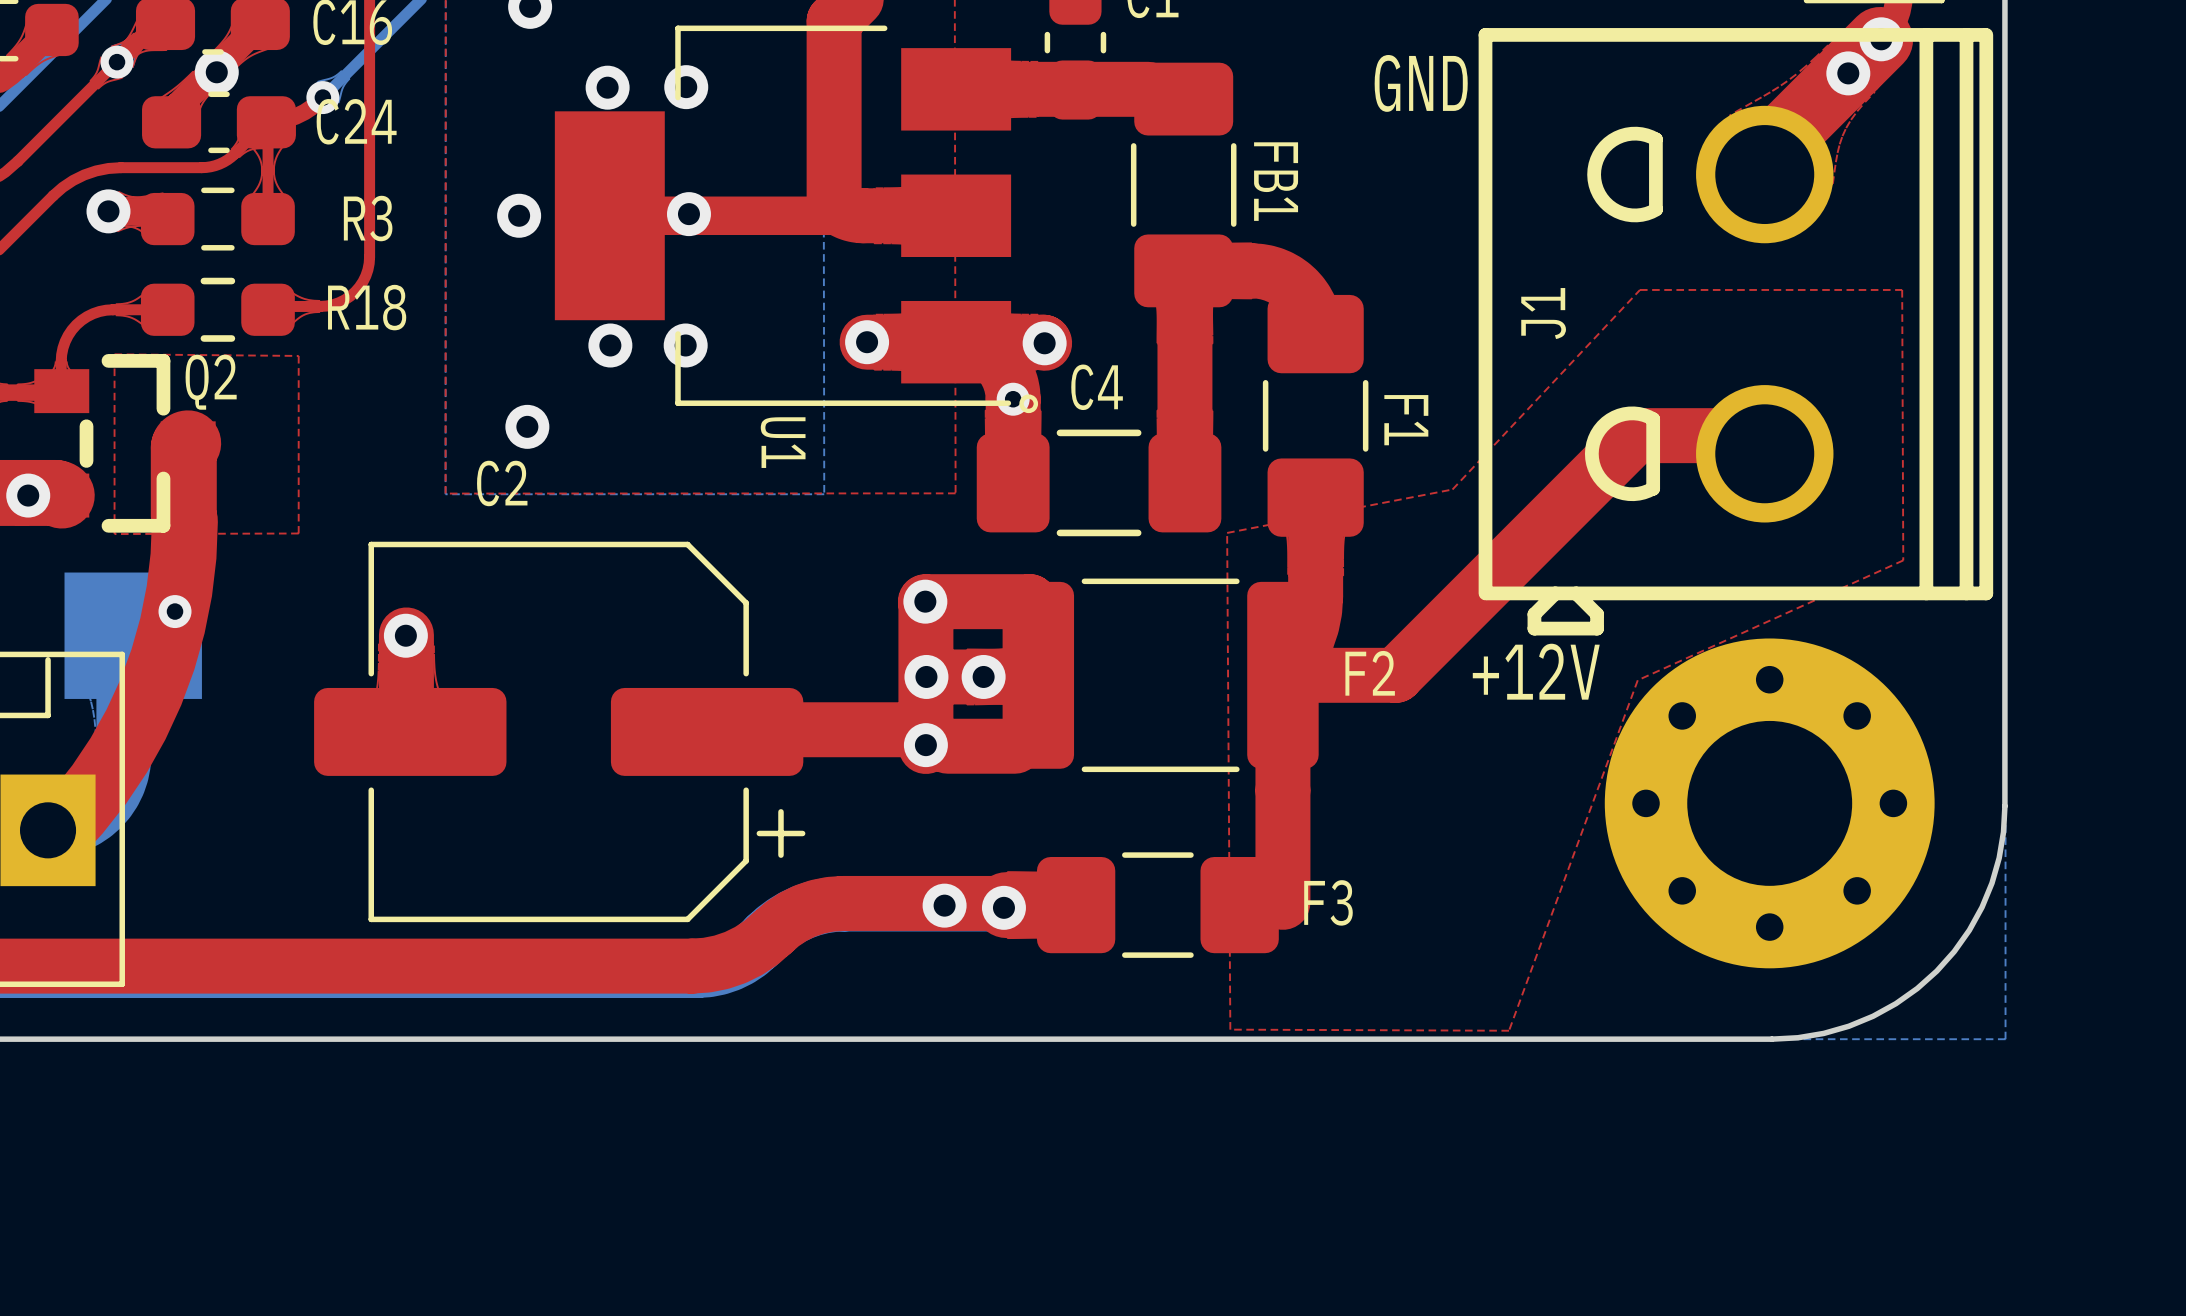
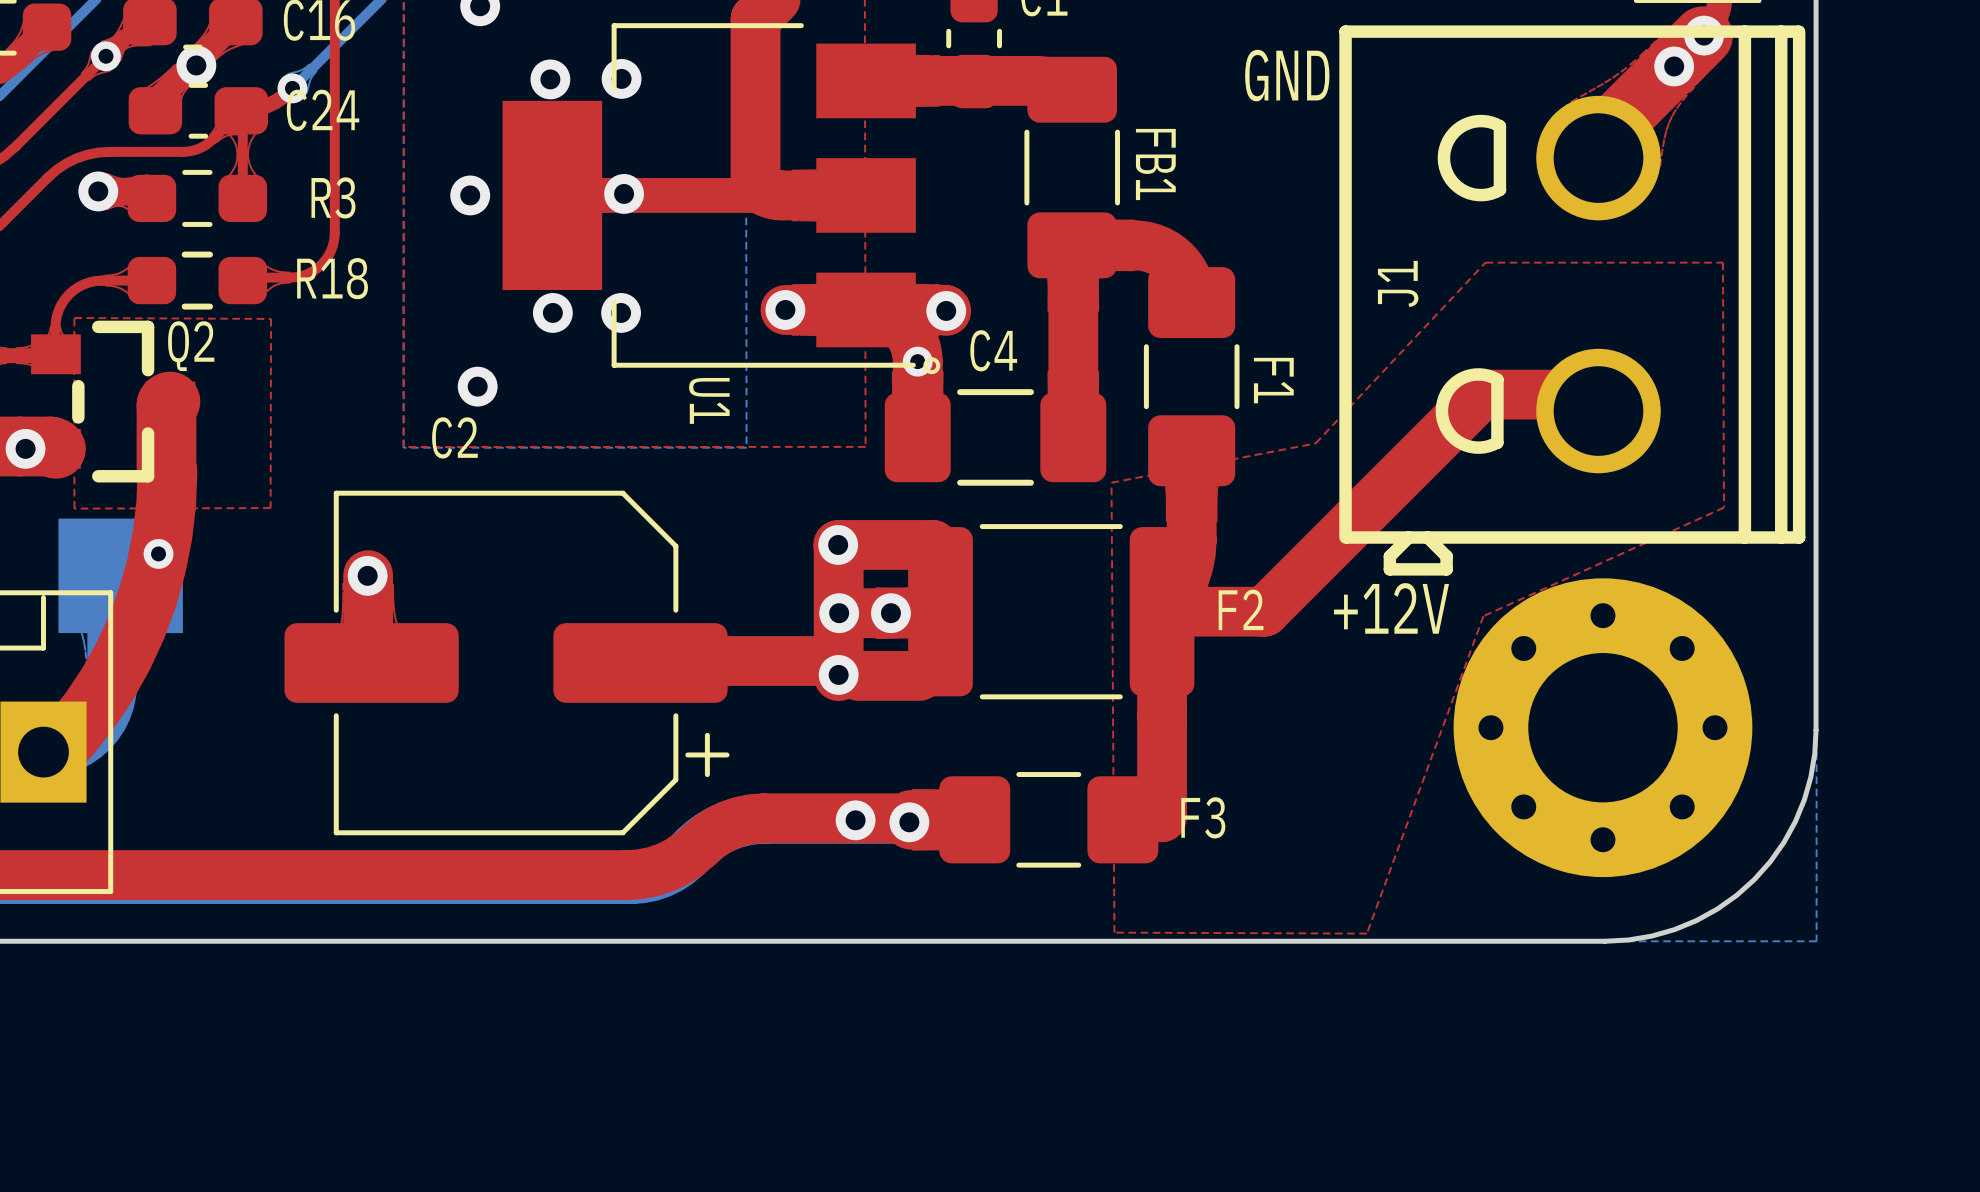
top zone outline: (114, 354) (114, 534) (298, 533) (298, 355) (114, 354) -> (74, 318) (74, 508) (270, 508) (271, 318) (74, 318)

